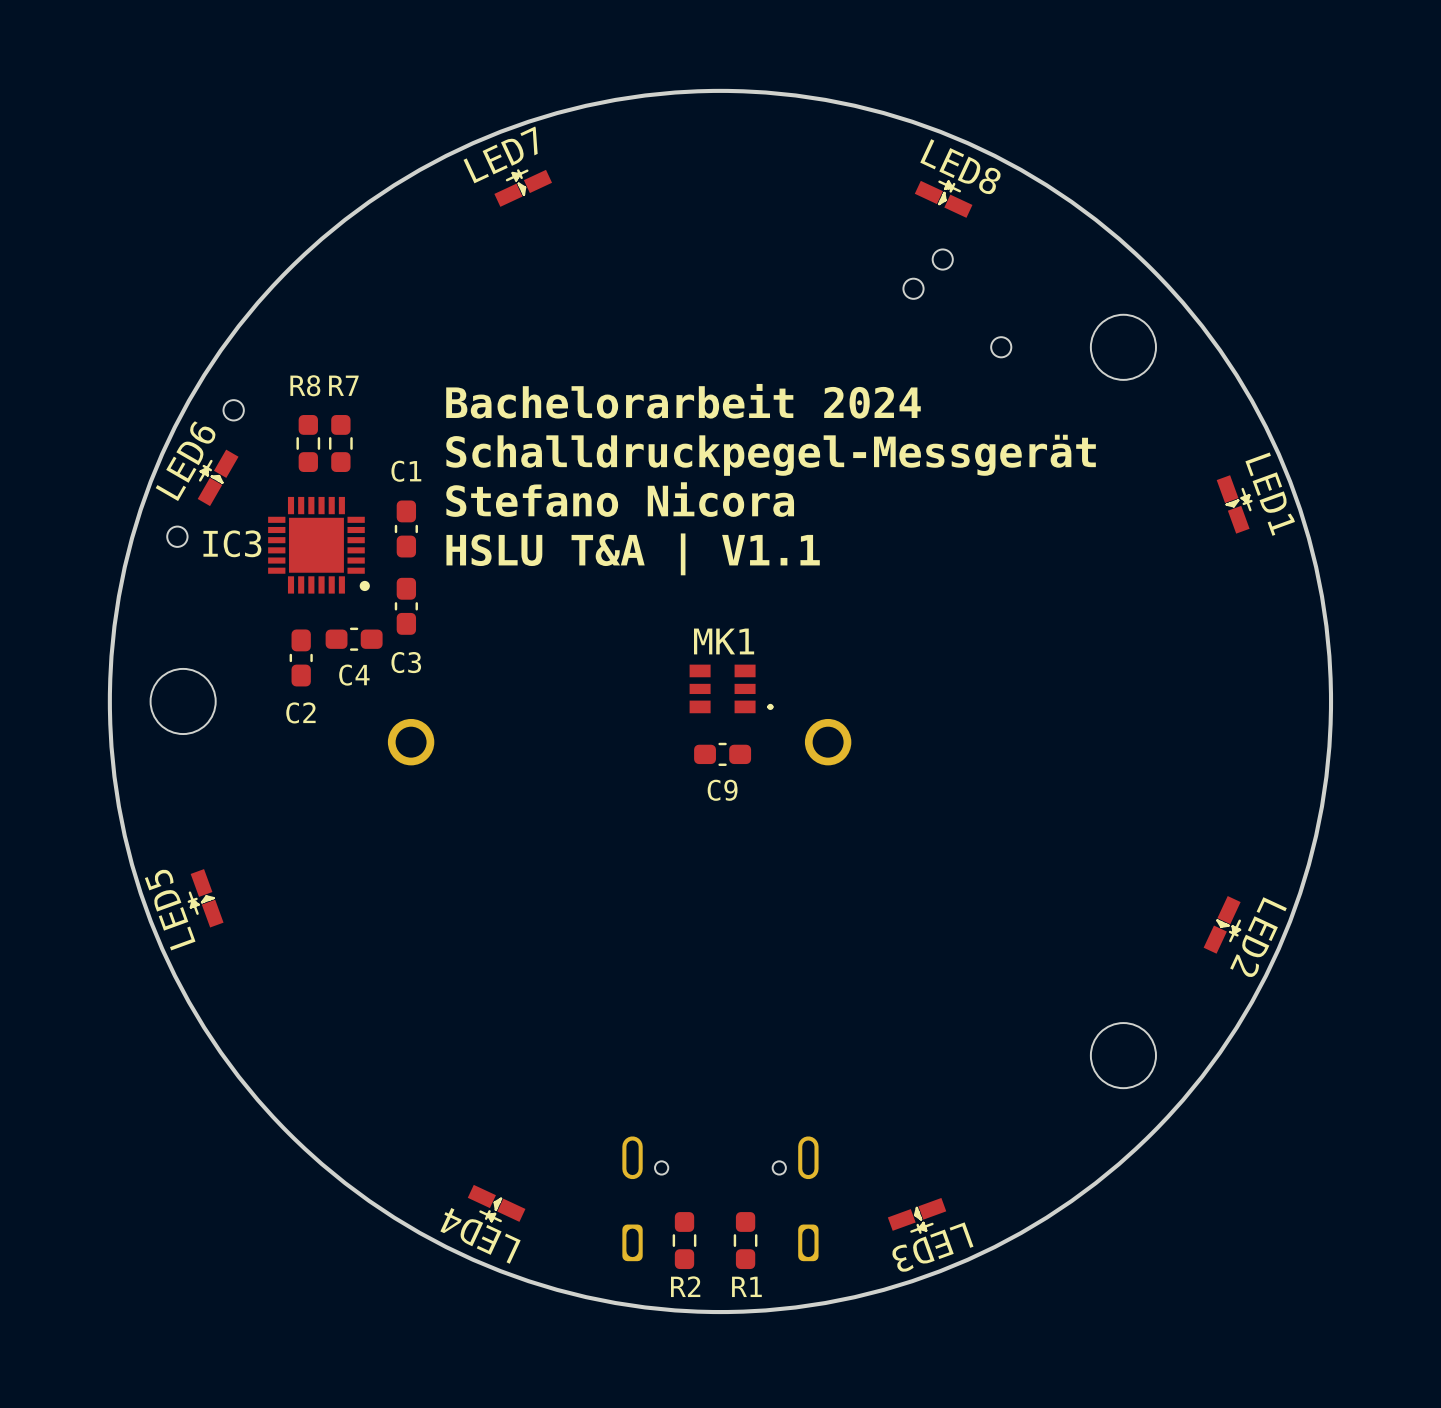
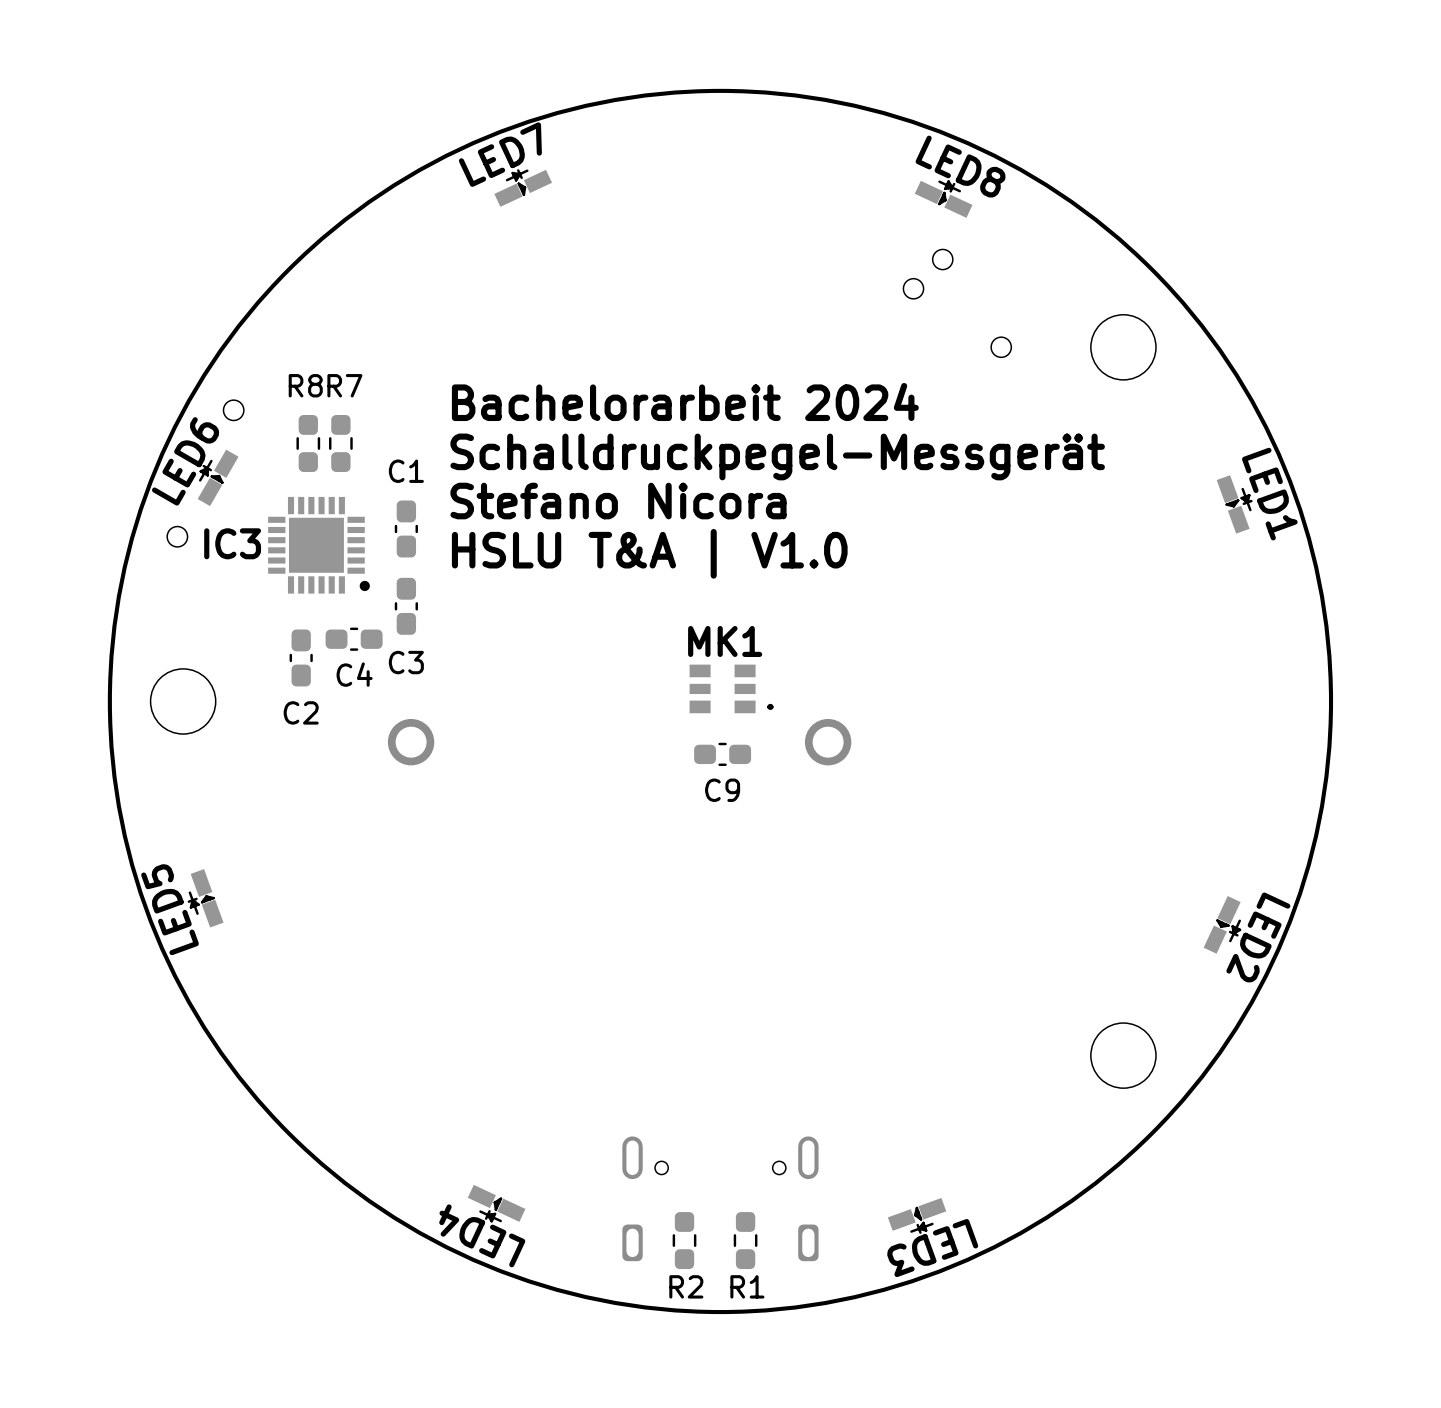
text: HSLU T&A | V1.1 (633, 554) -> HSLU T&A | V1.0 (649, 553)

